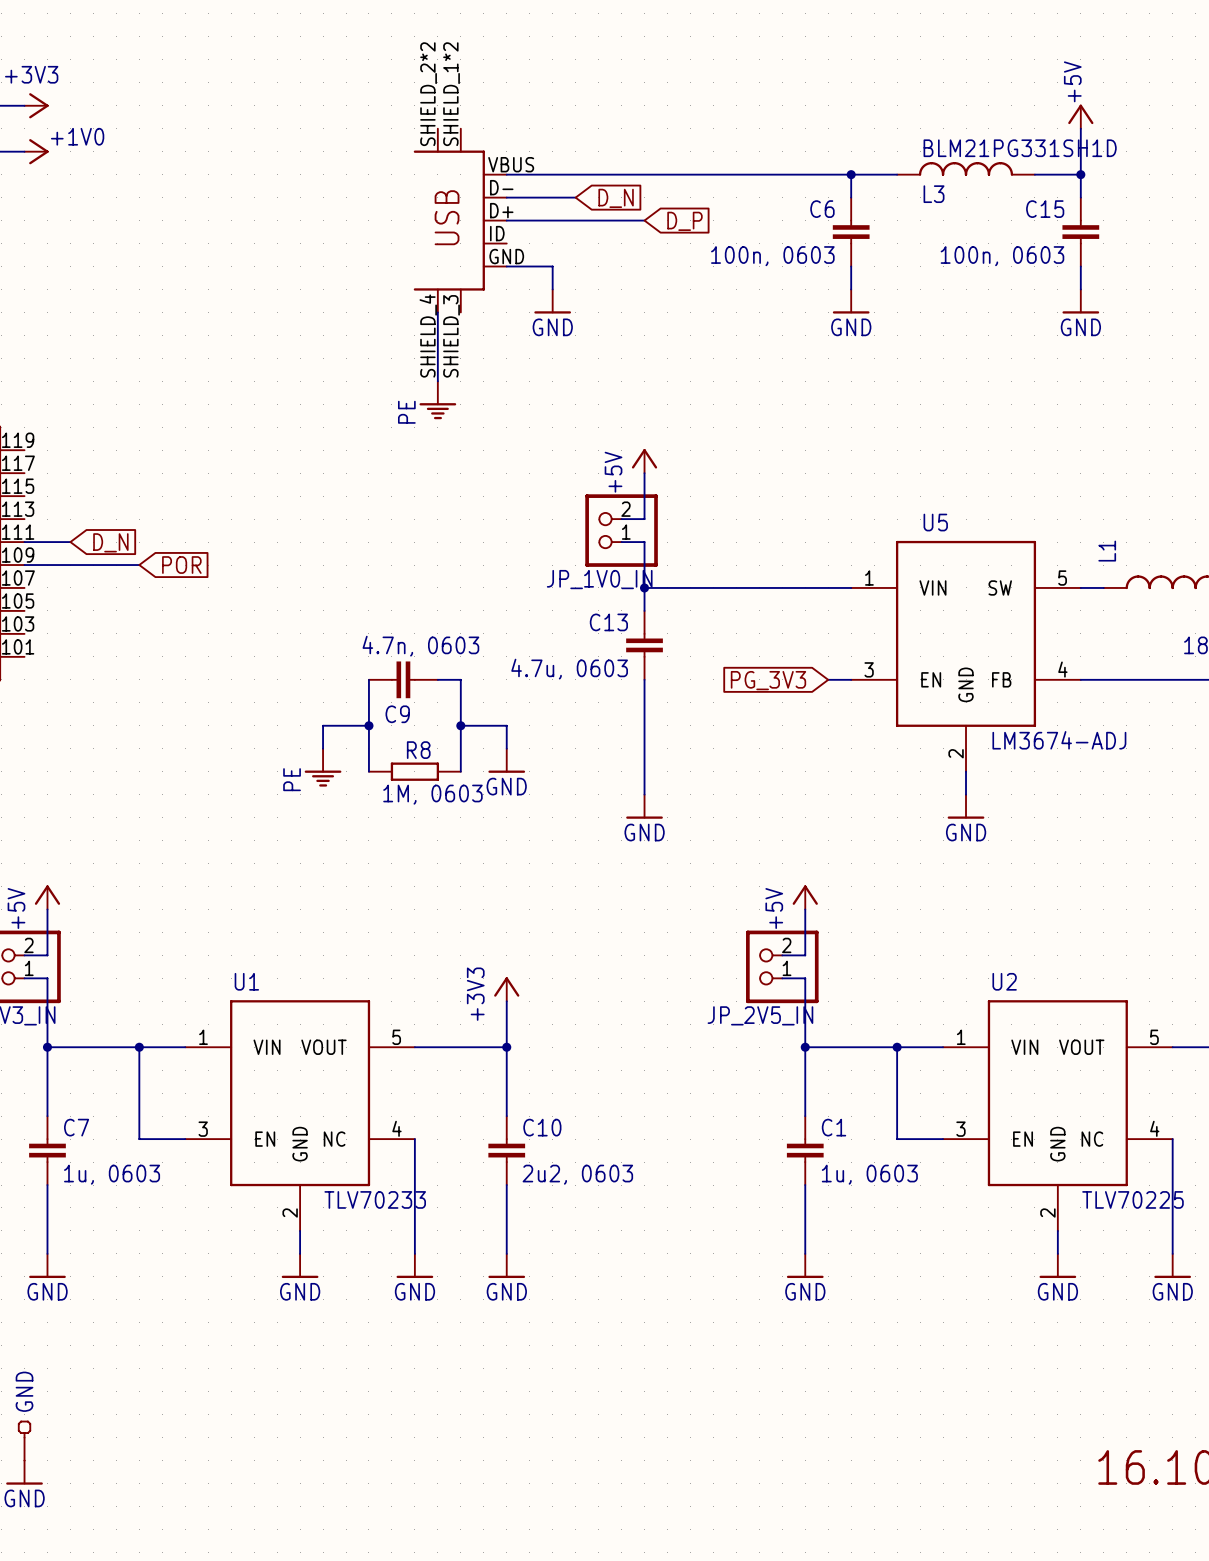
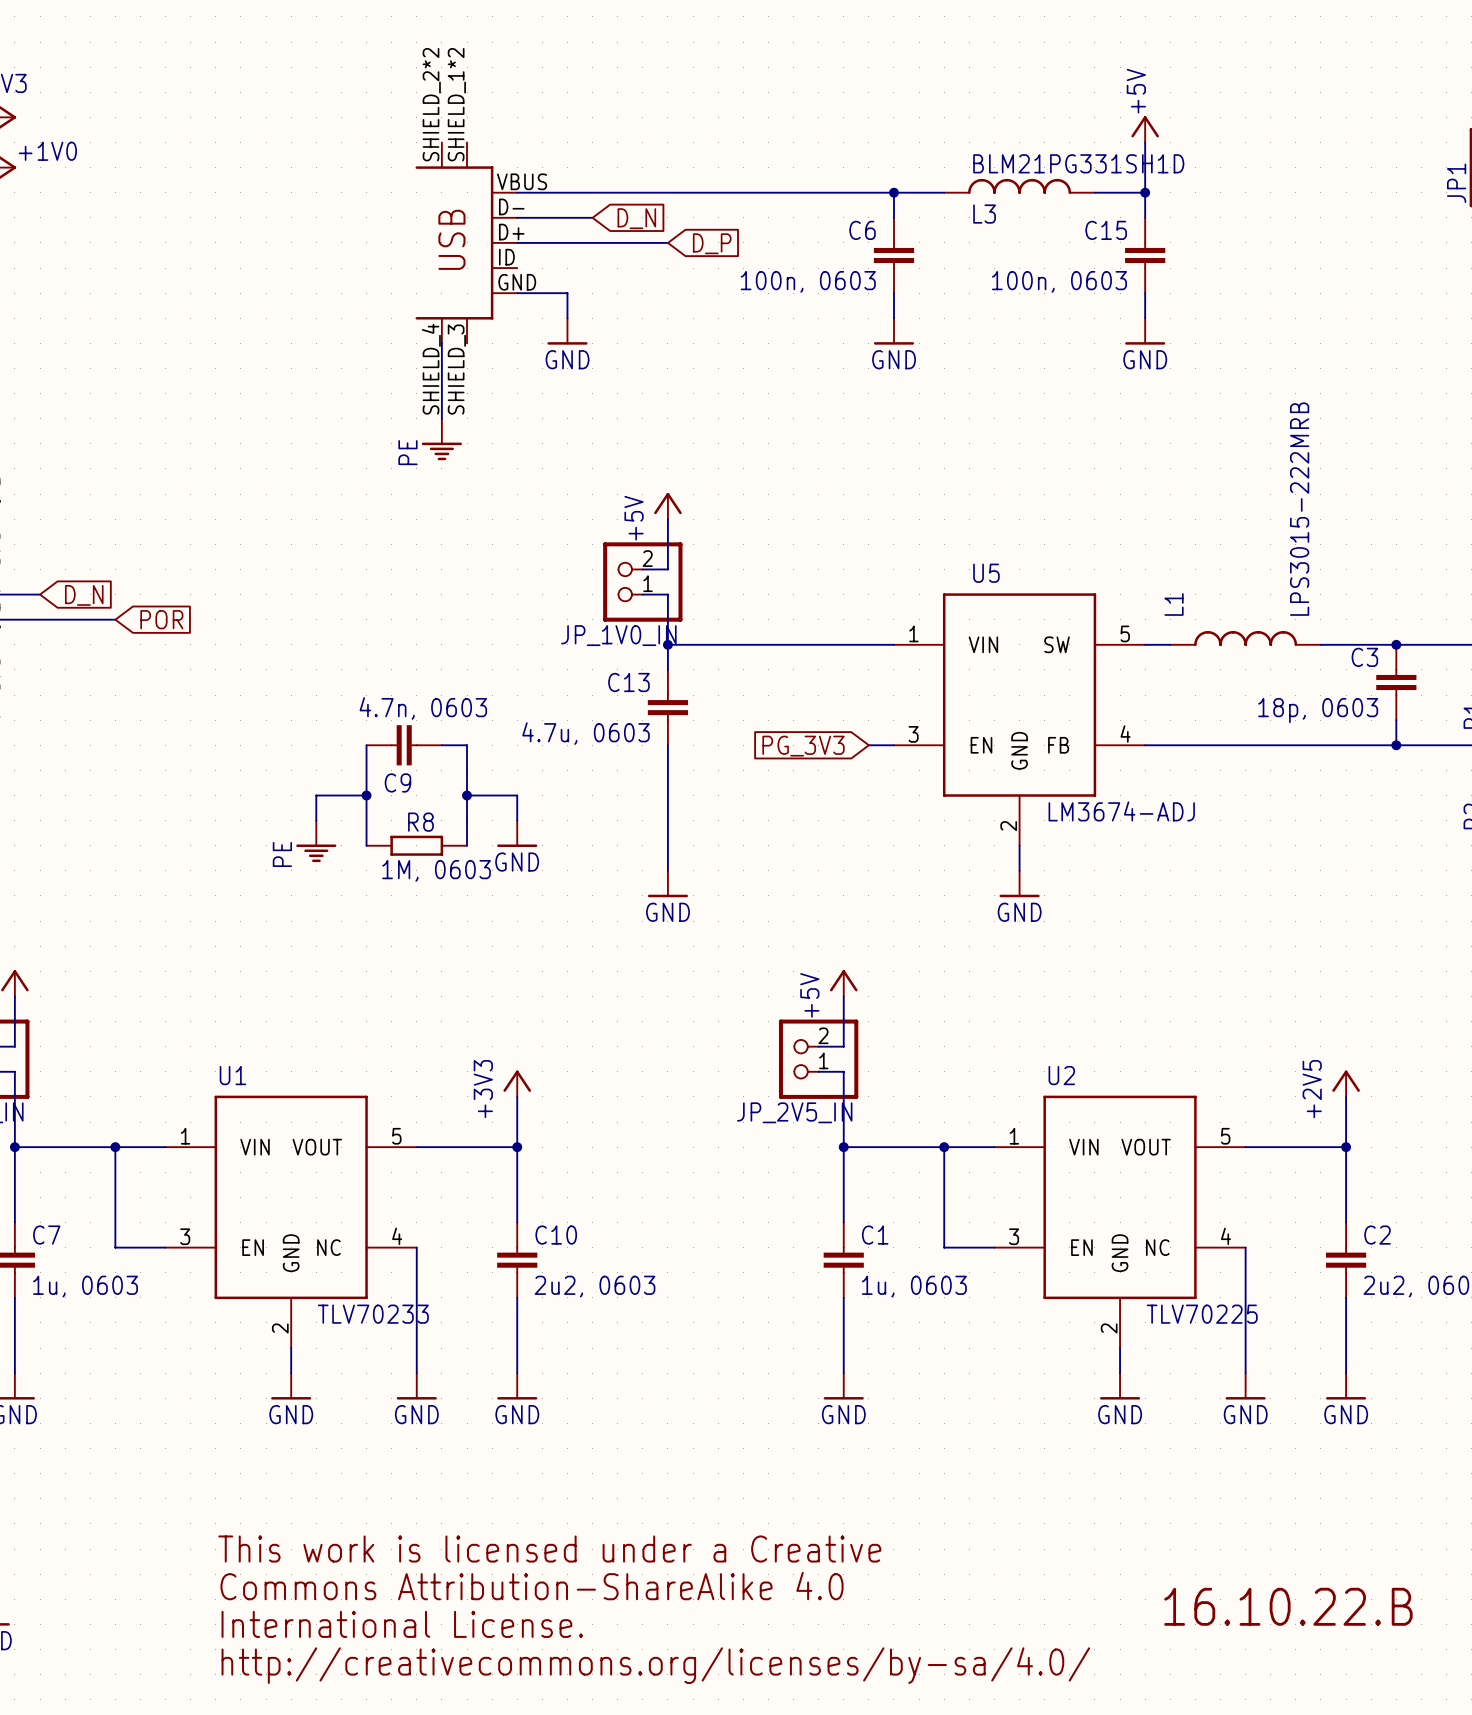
text: none -> This work is licensed under a Creative (549, 1549)
text: none -> Commons Attribution-ShareAlike 4.0 (532, 1586)
text: none -> International License. (402, 1624)
text: none -> http://creativecommons.org/licenses/by-sa/4.0/ (655, 1665)

